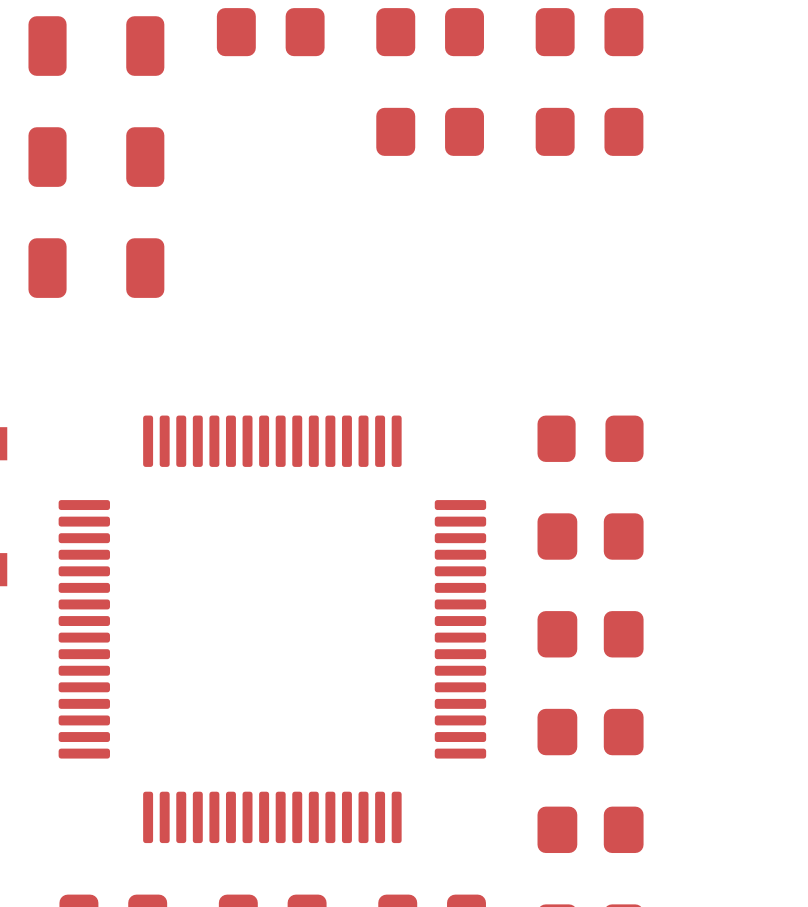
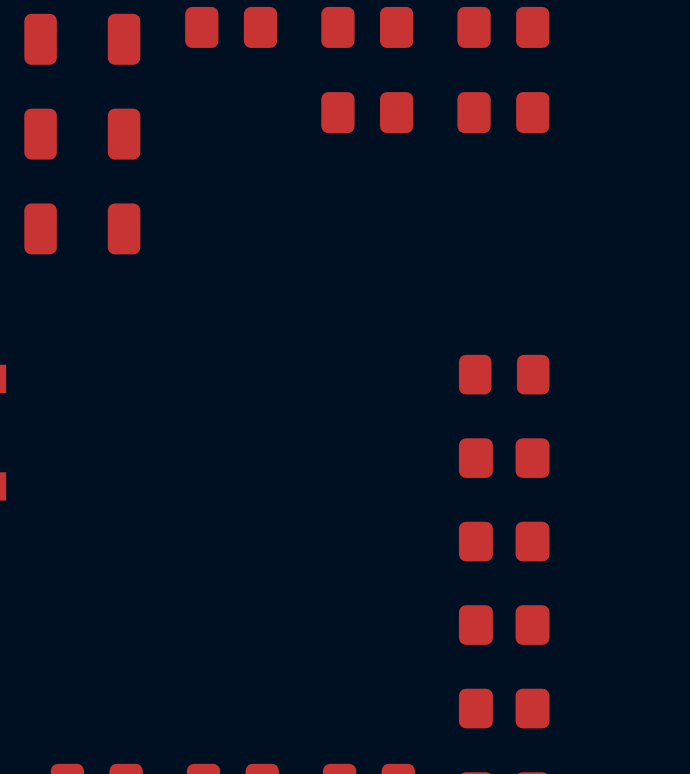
part: (272, 629) -> none

